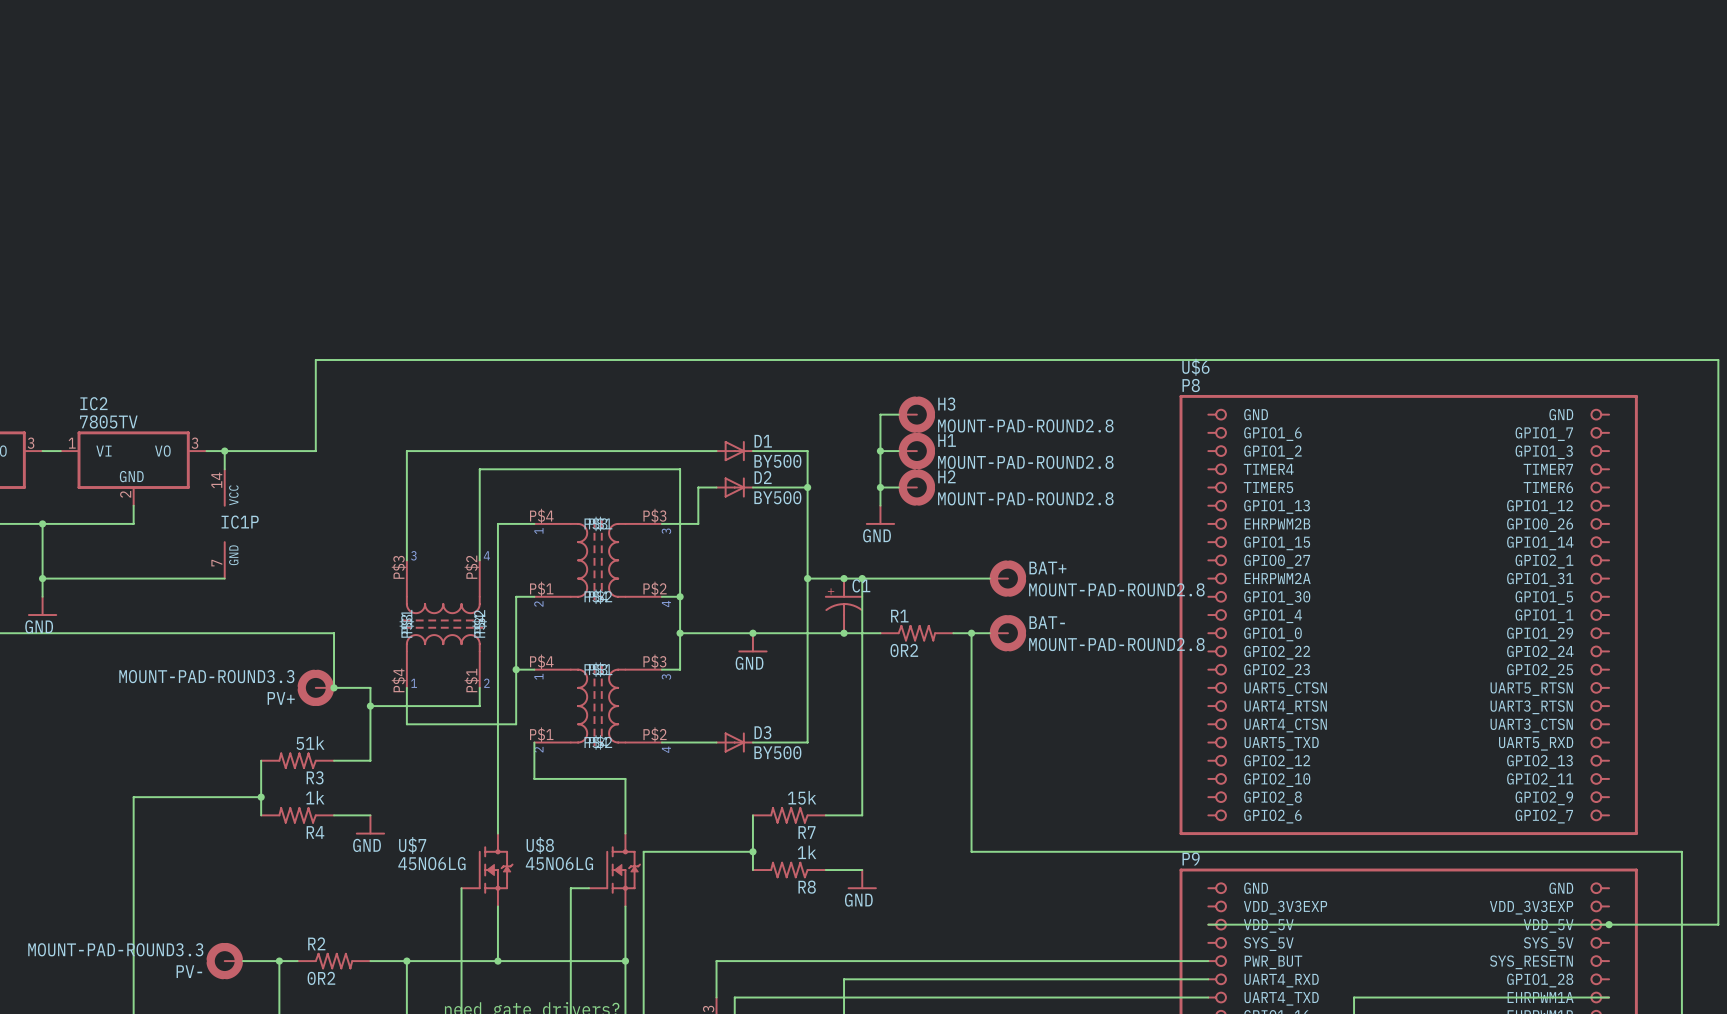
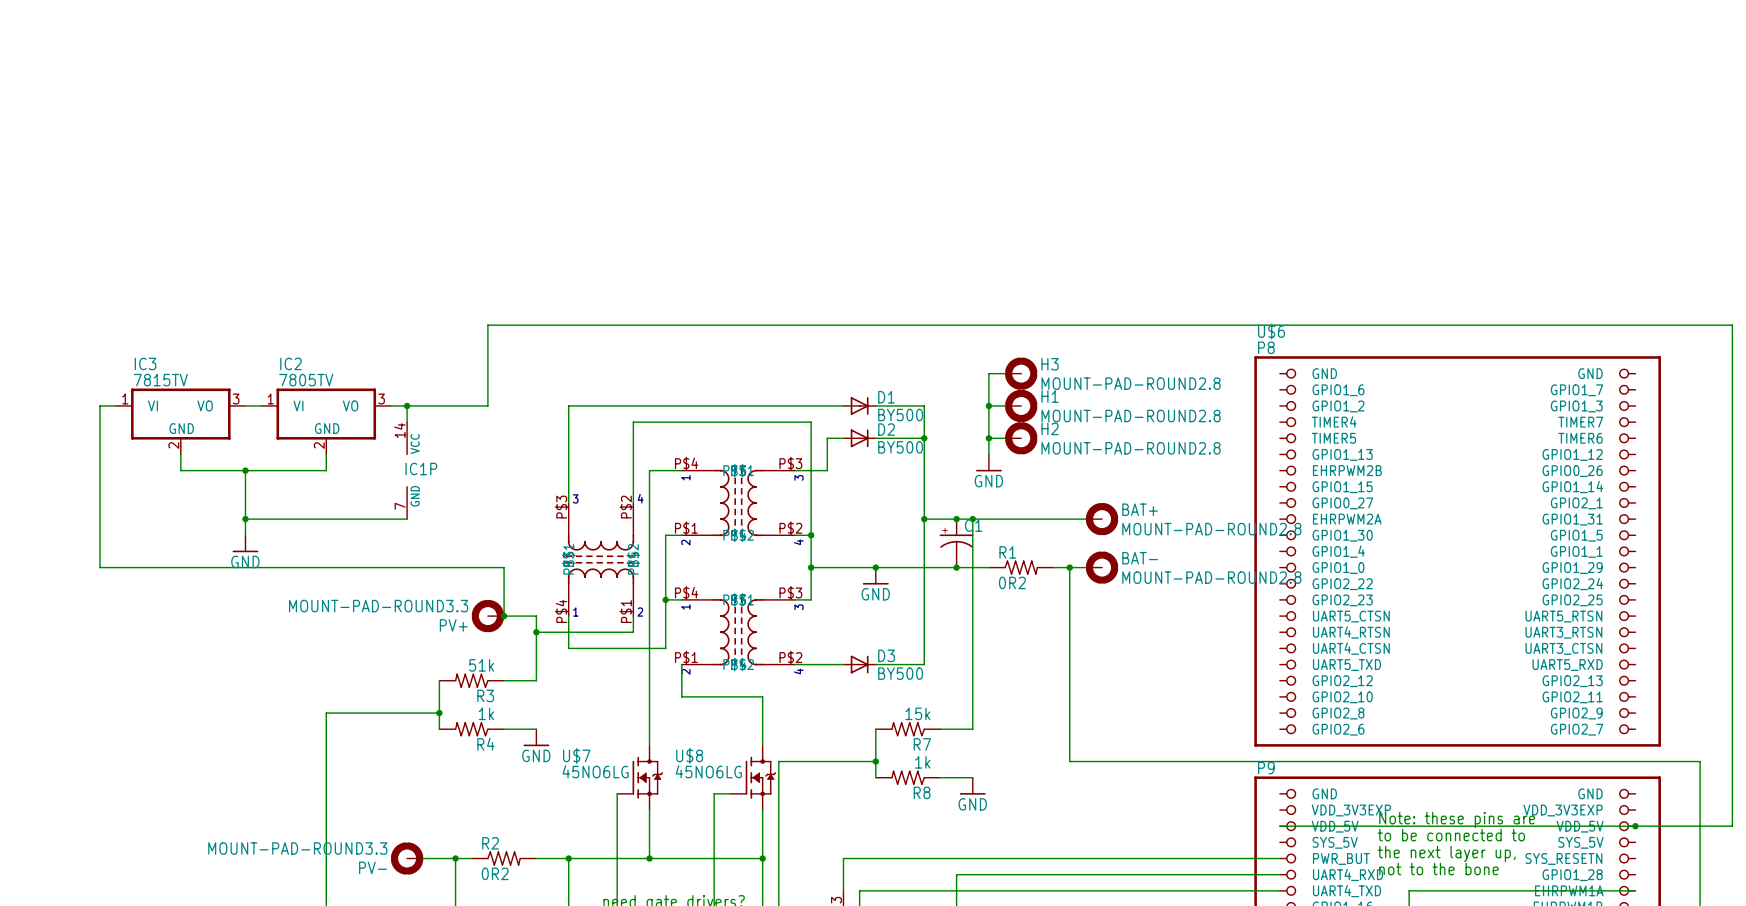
text: none -> Note: these pins are (1457, 820)
text: none -> to be connected to (1451, 835)
text: none -> the next layer up, (1446, 853)
text: none -> not to the bone (1439, 869)

